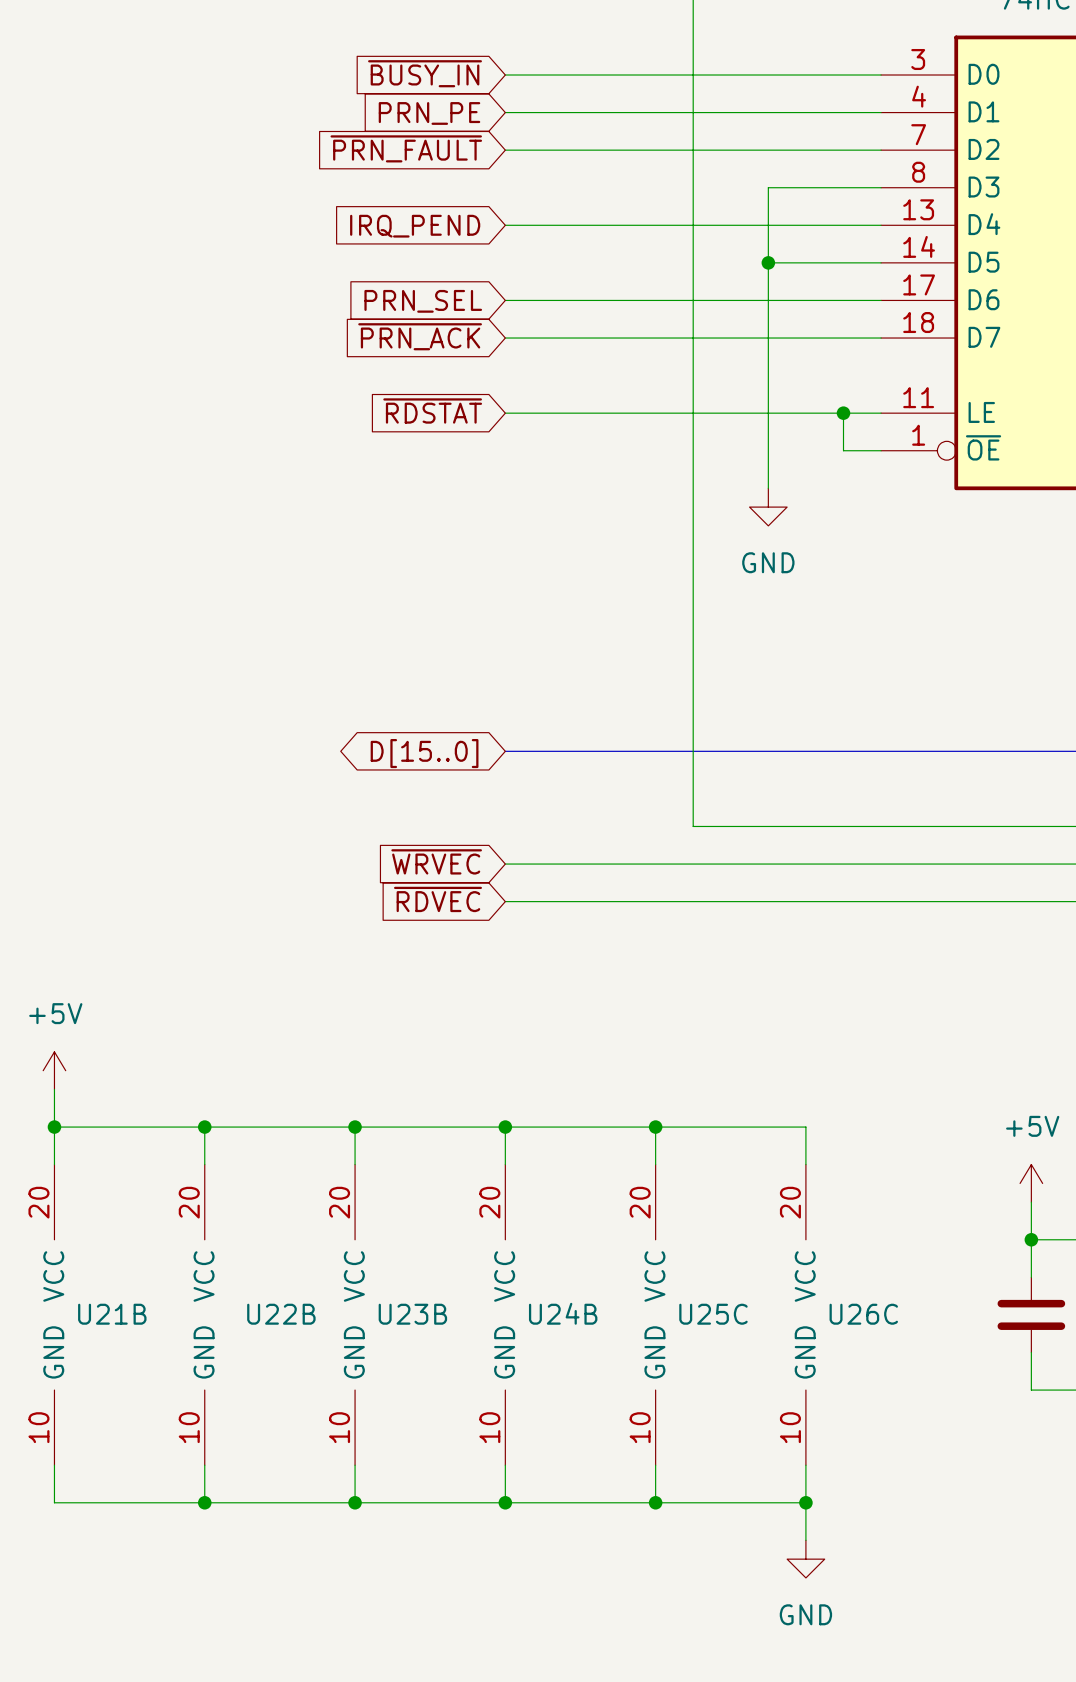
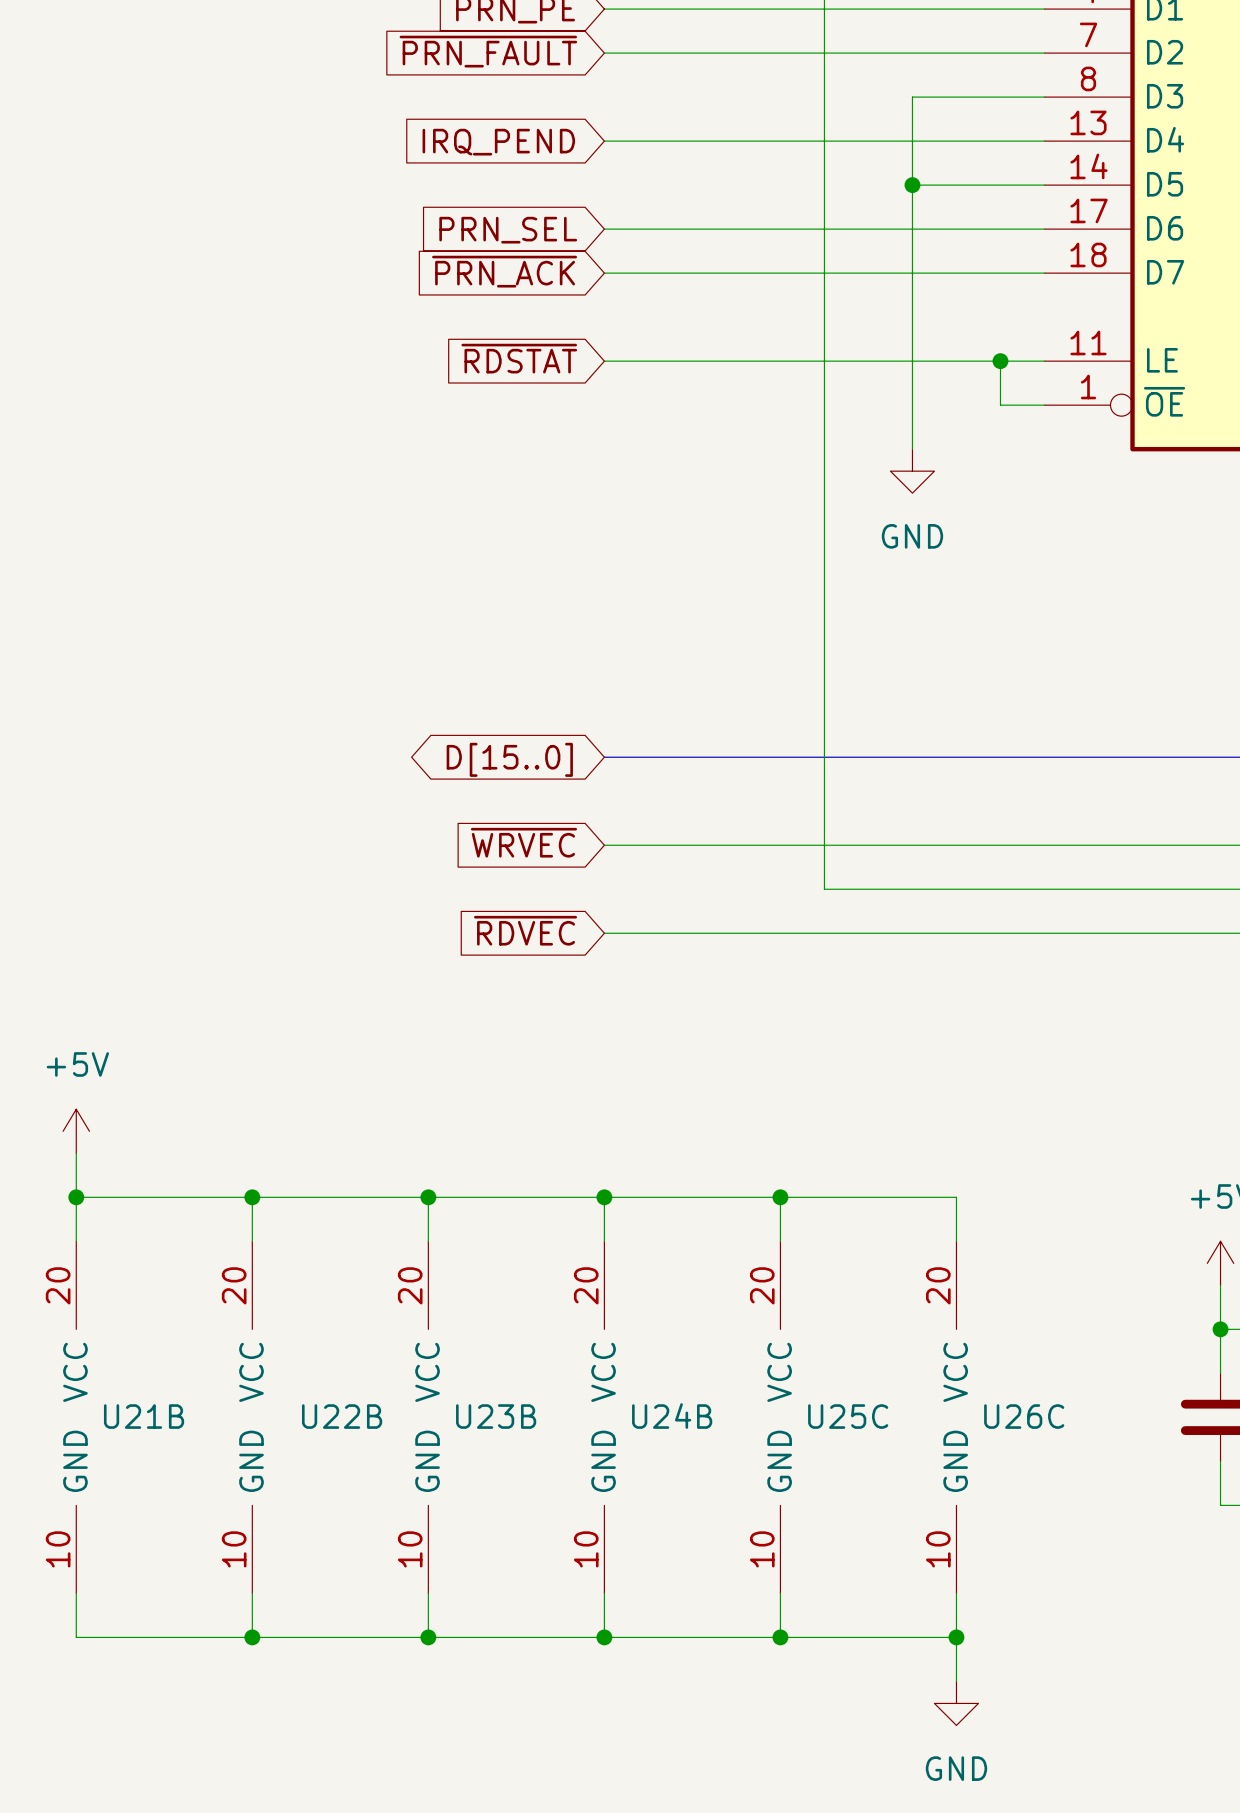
global label position: ~{WRVEC} (436, 861) -> ~{WRVEC} (523, 842)
wire: (505, 864) (693, 864) -> (604, 845) (824, 845) (824, 889)

